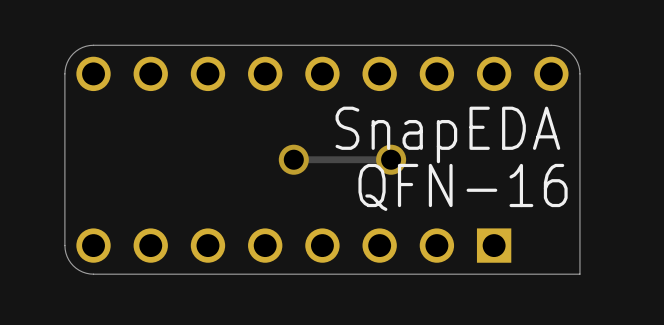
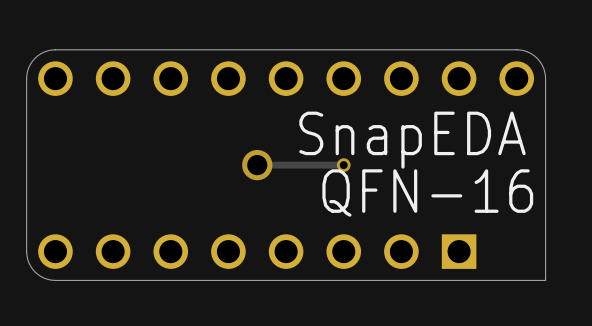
via size: [376, 144, 407, 175] -> [336, 158, 351, 172]

